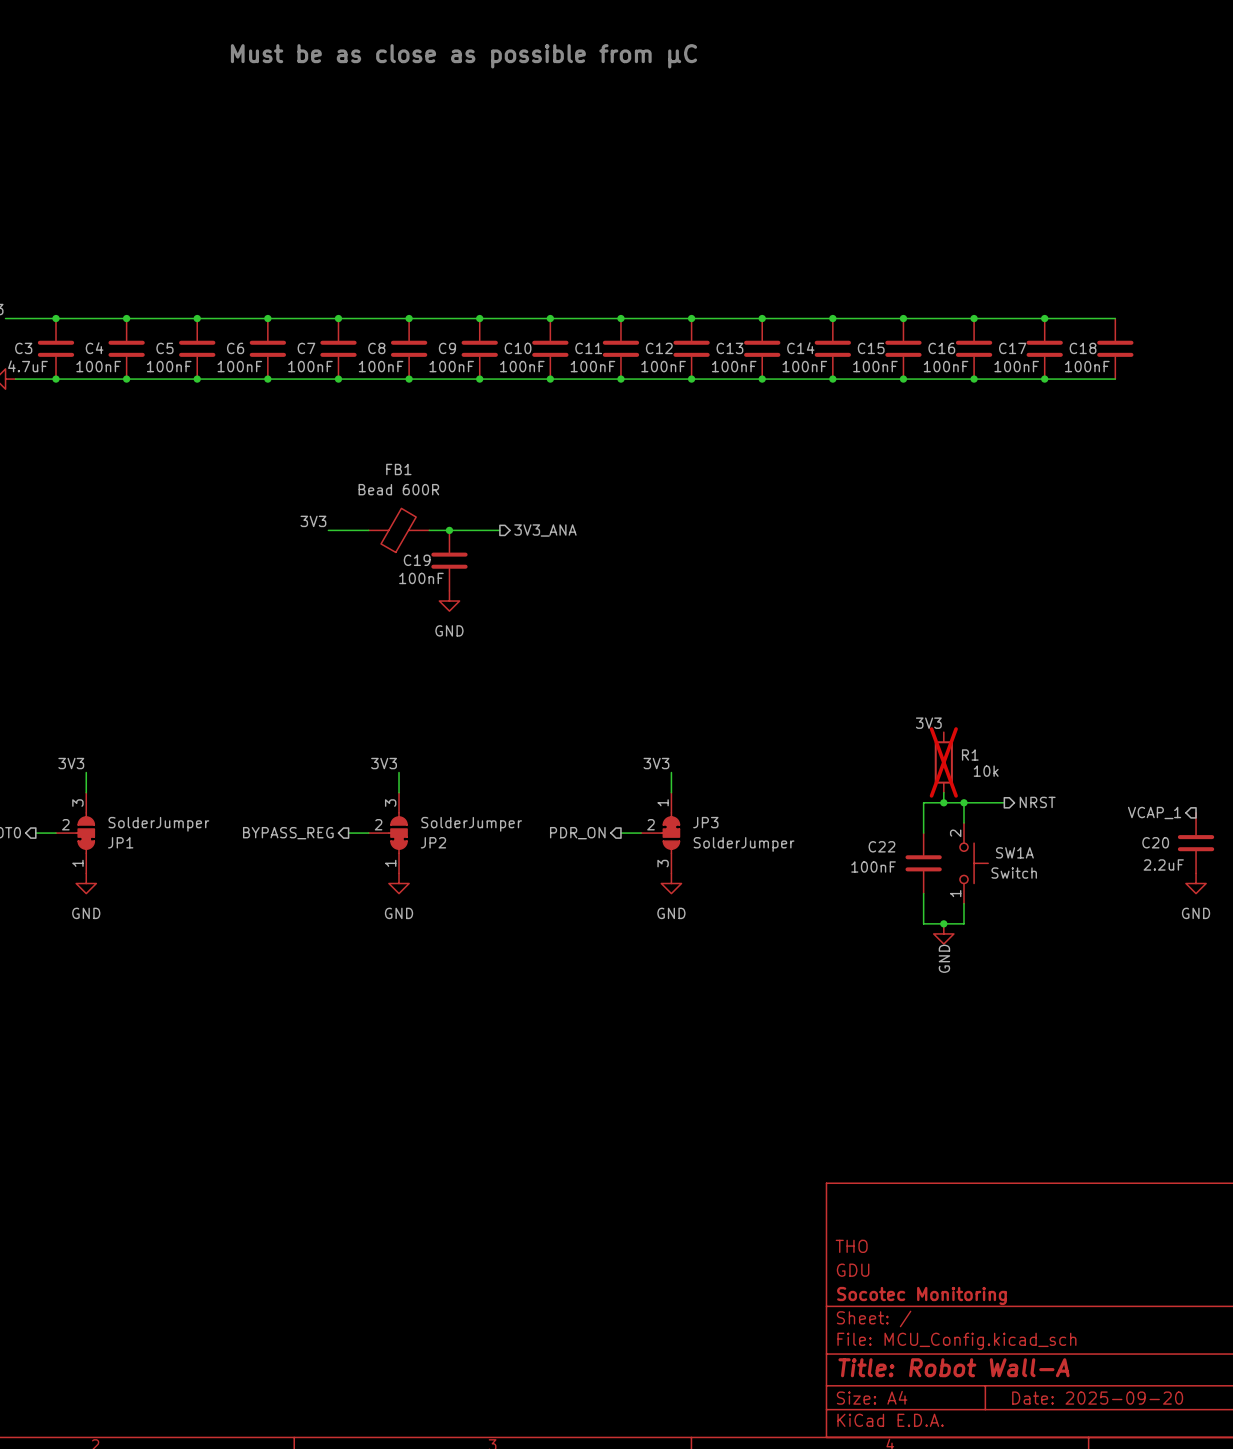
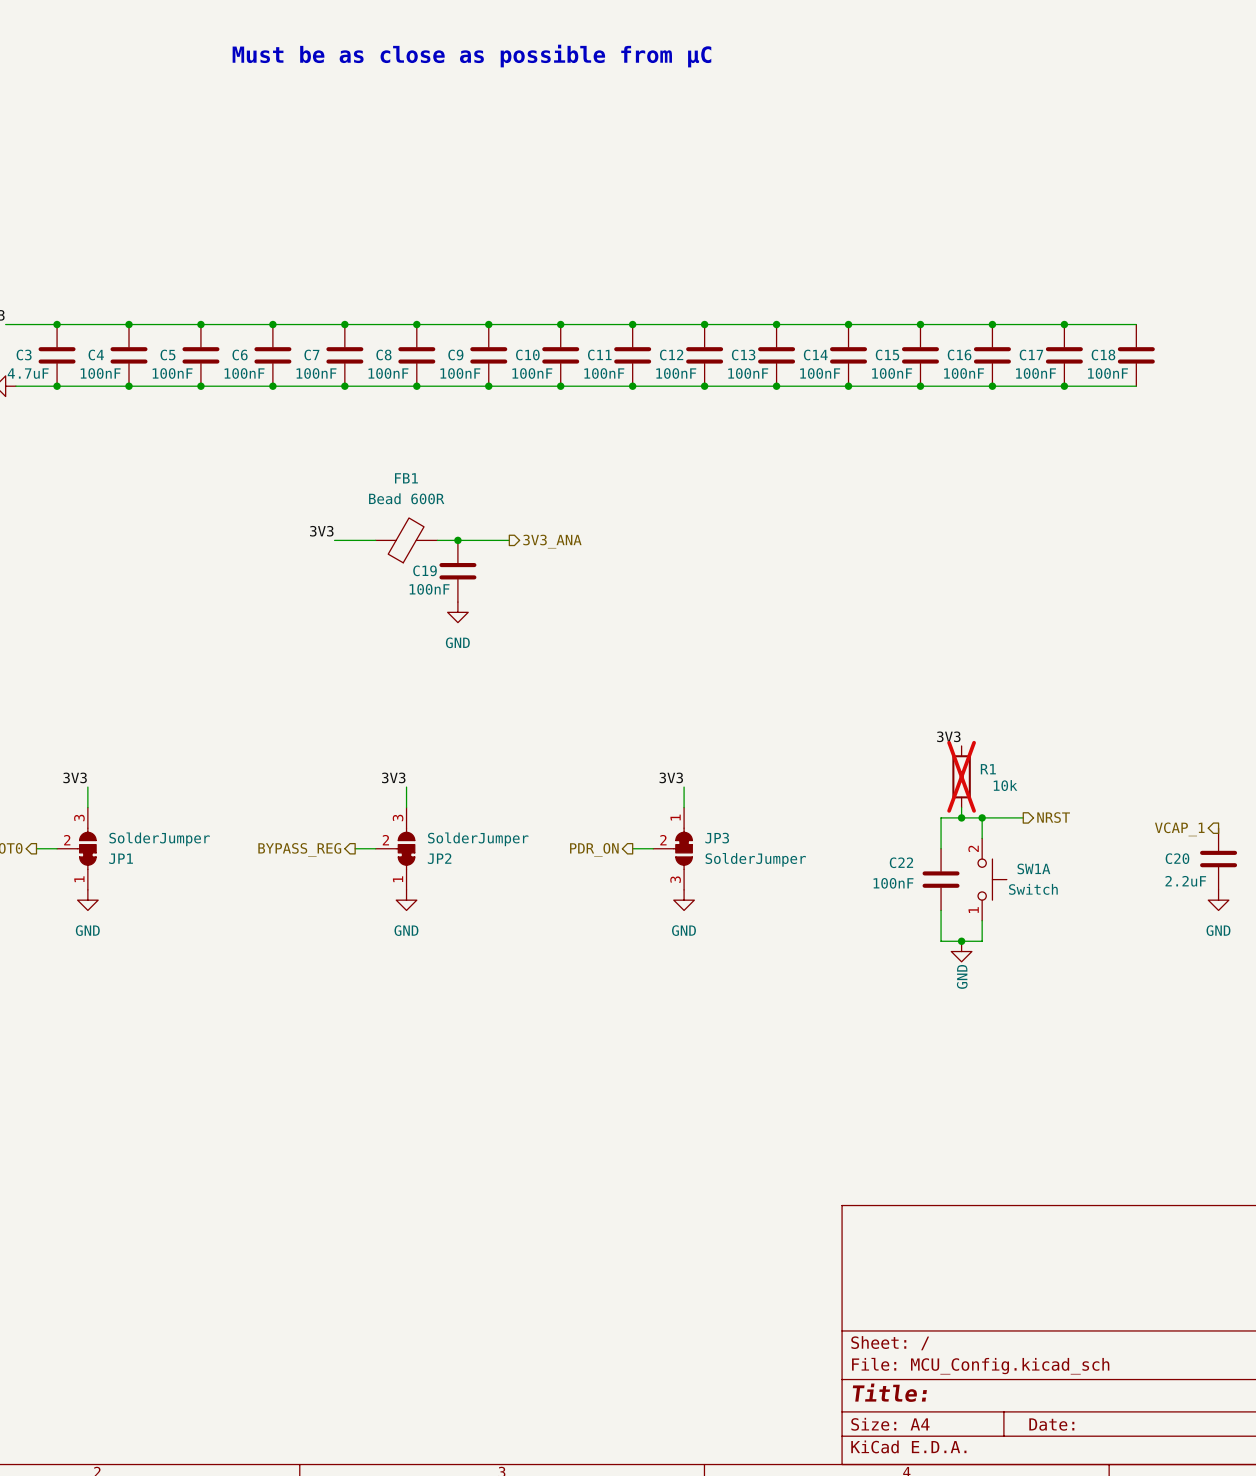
title block: THO (851, 1246) -> none
title block: GDU (853, 1270) -> none
title block: Socotec Monitoring (921, 1295) -> none
title block: Title: Robot Wall-A (954, 1367) -> Title: (889, 1392)
title block: Date: 2025-09-20 (1097, 1398) -> Date: (1051, 1424)

